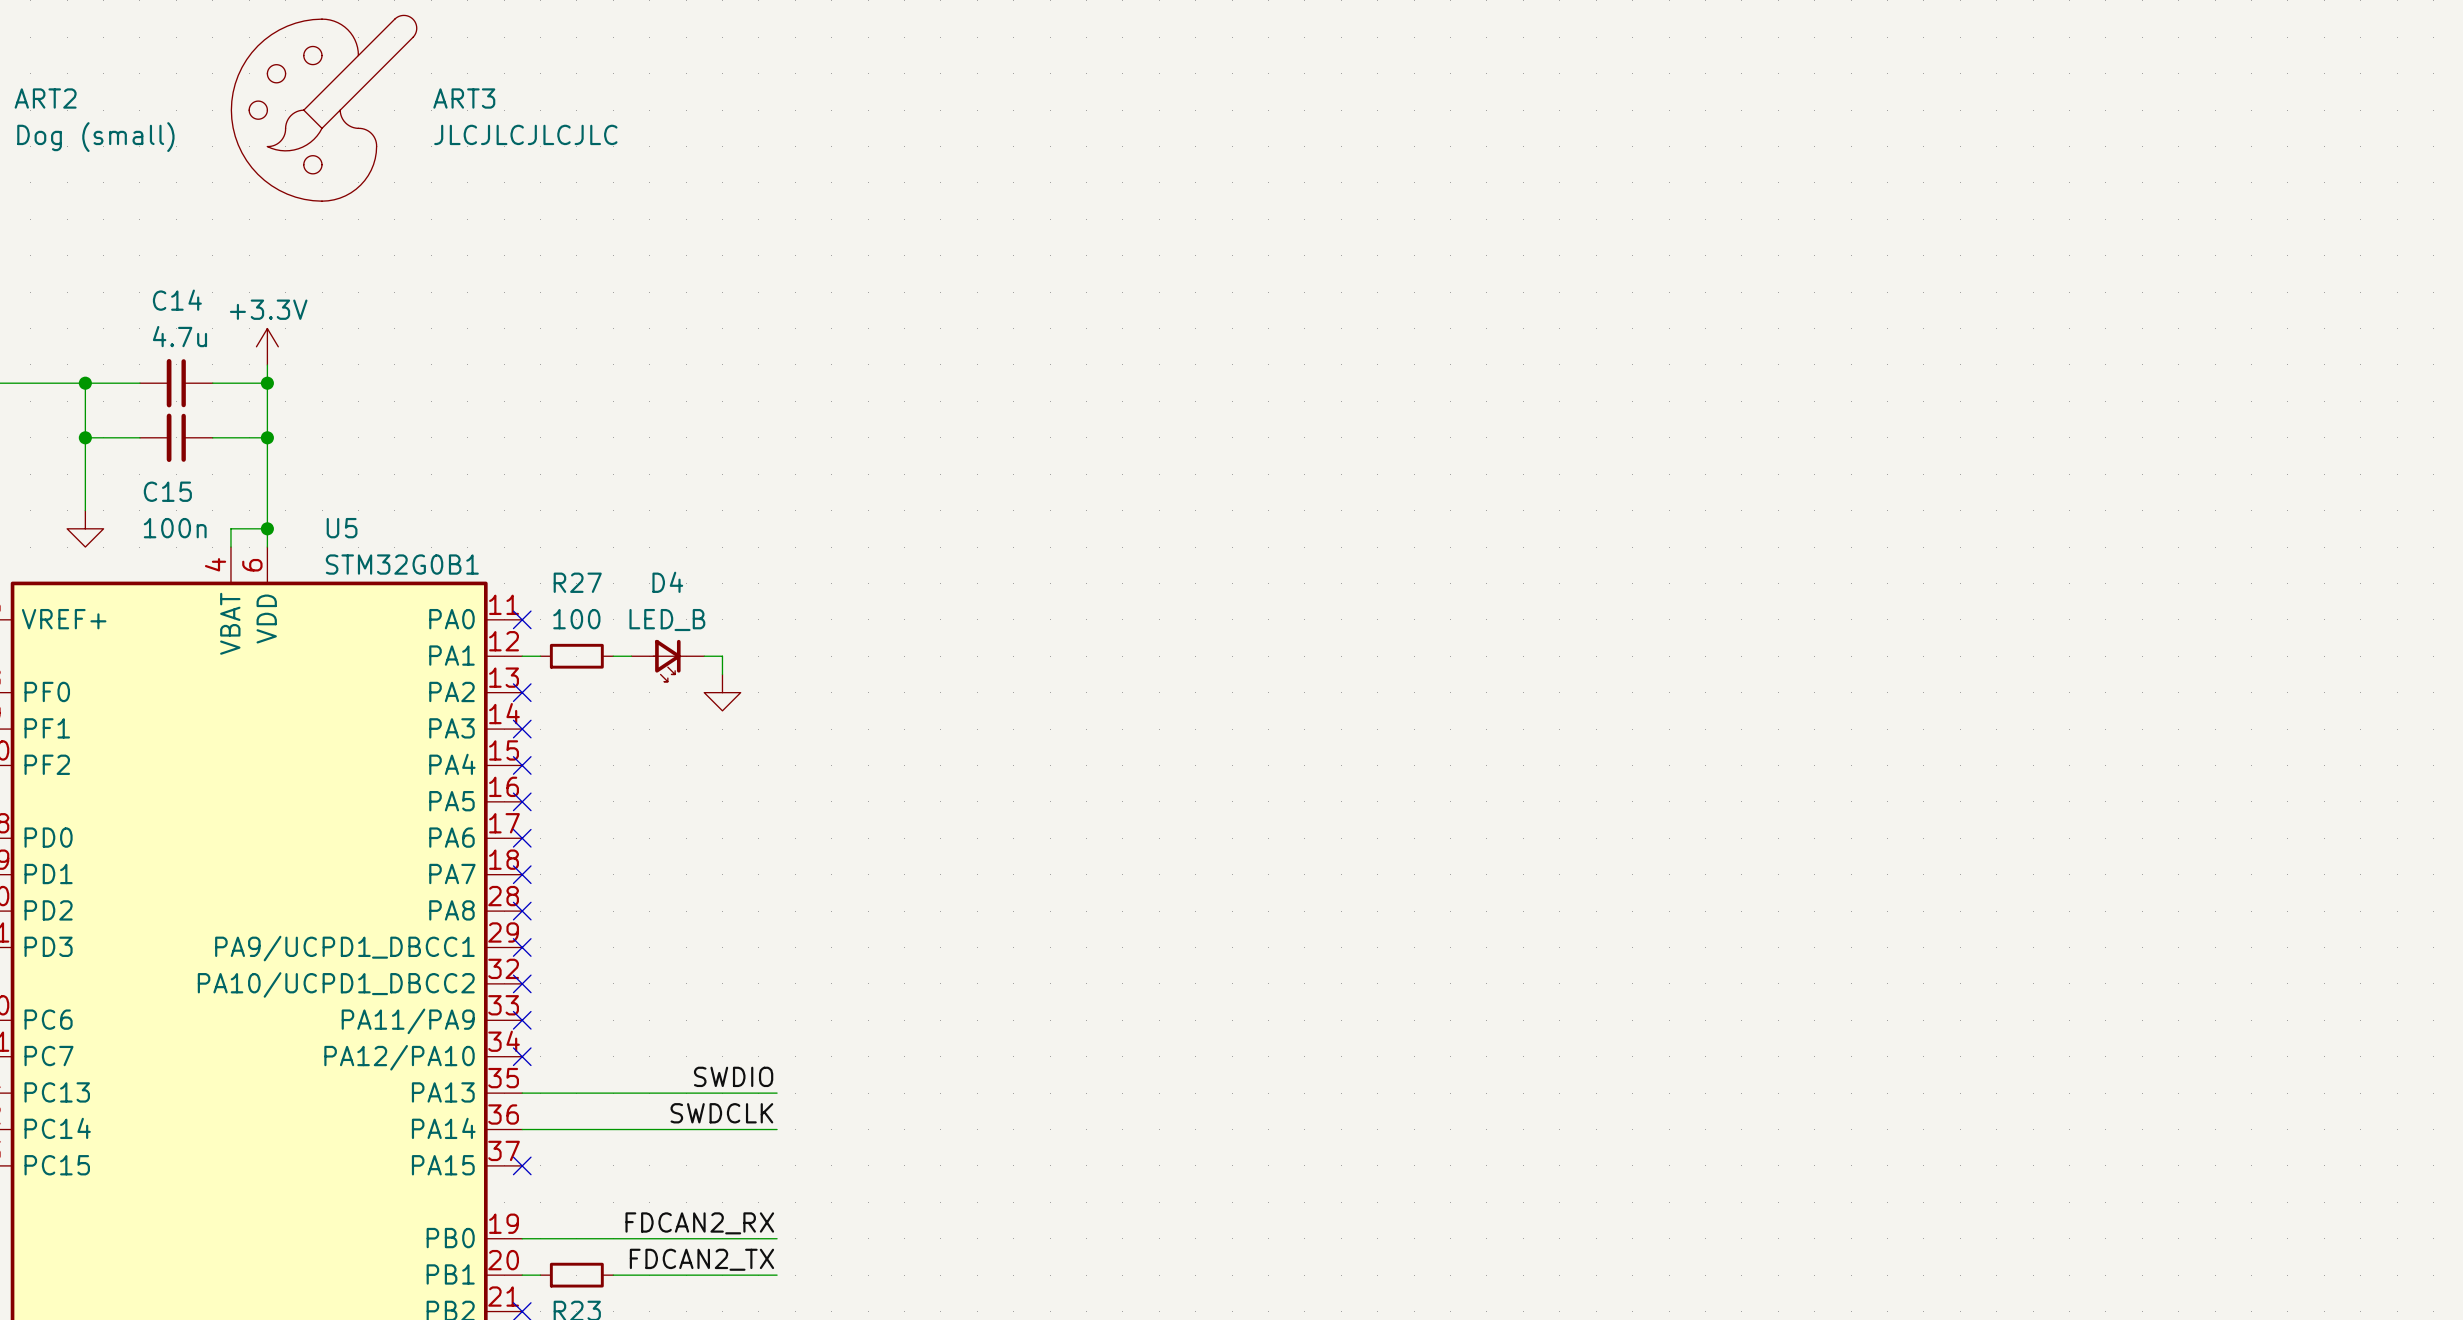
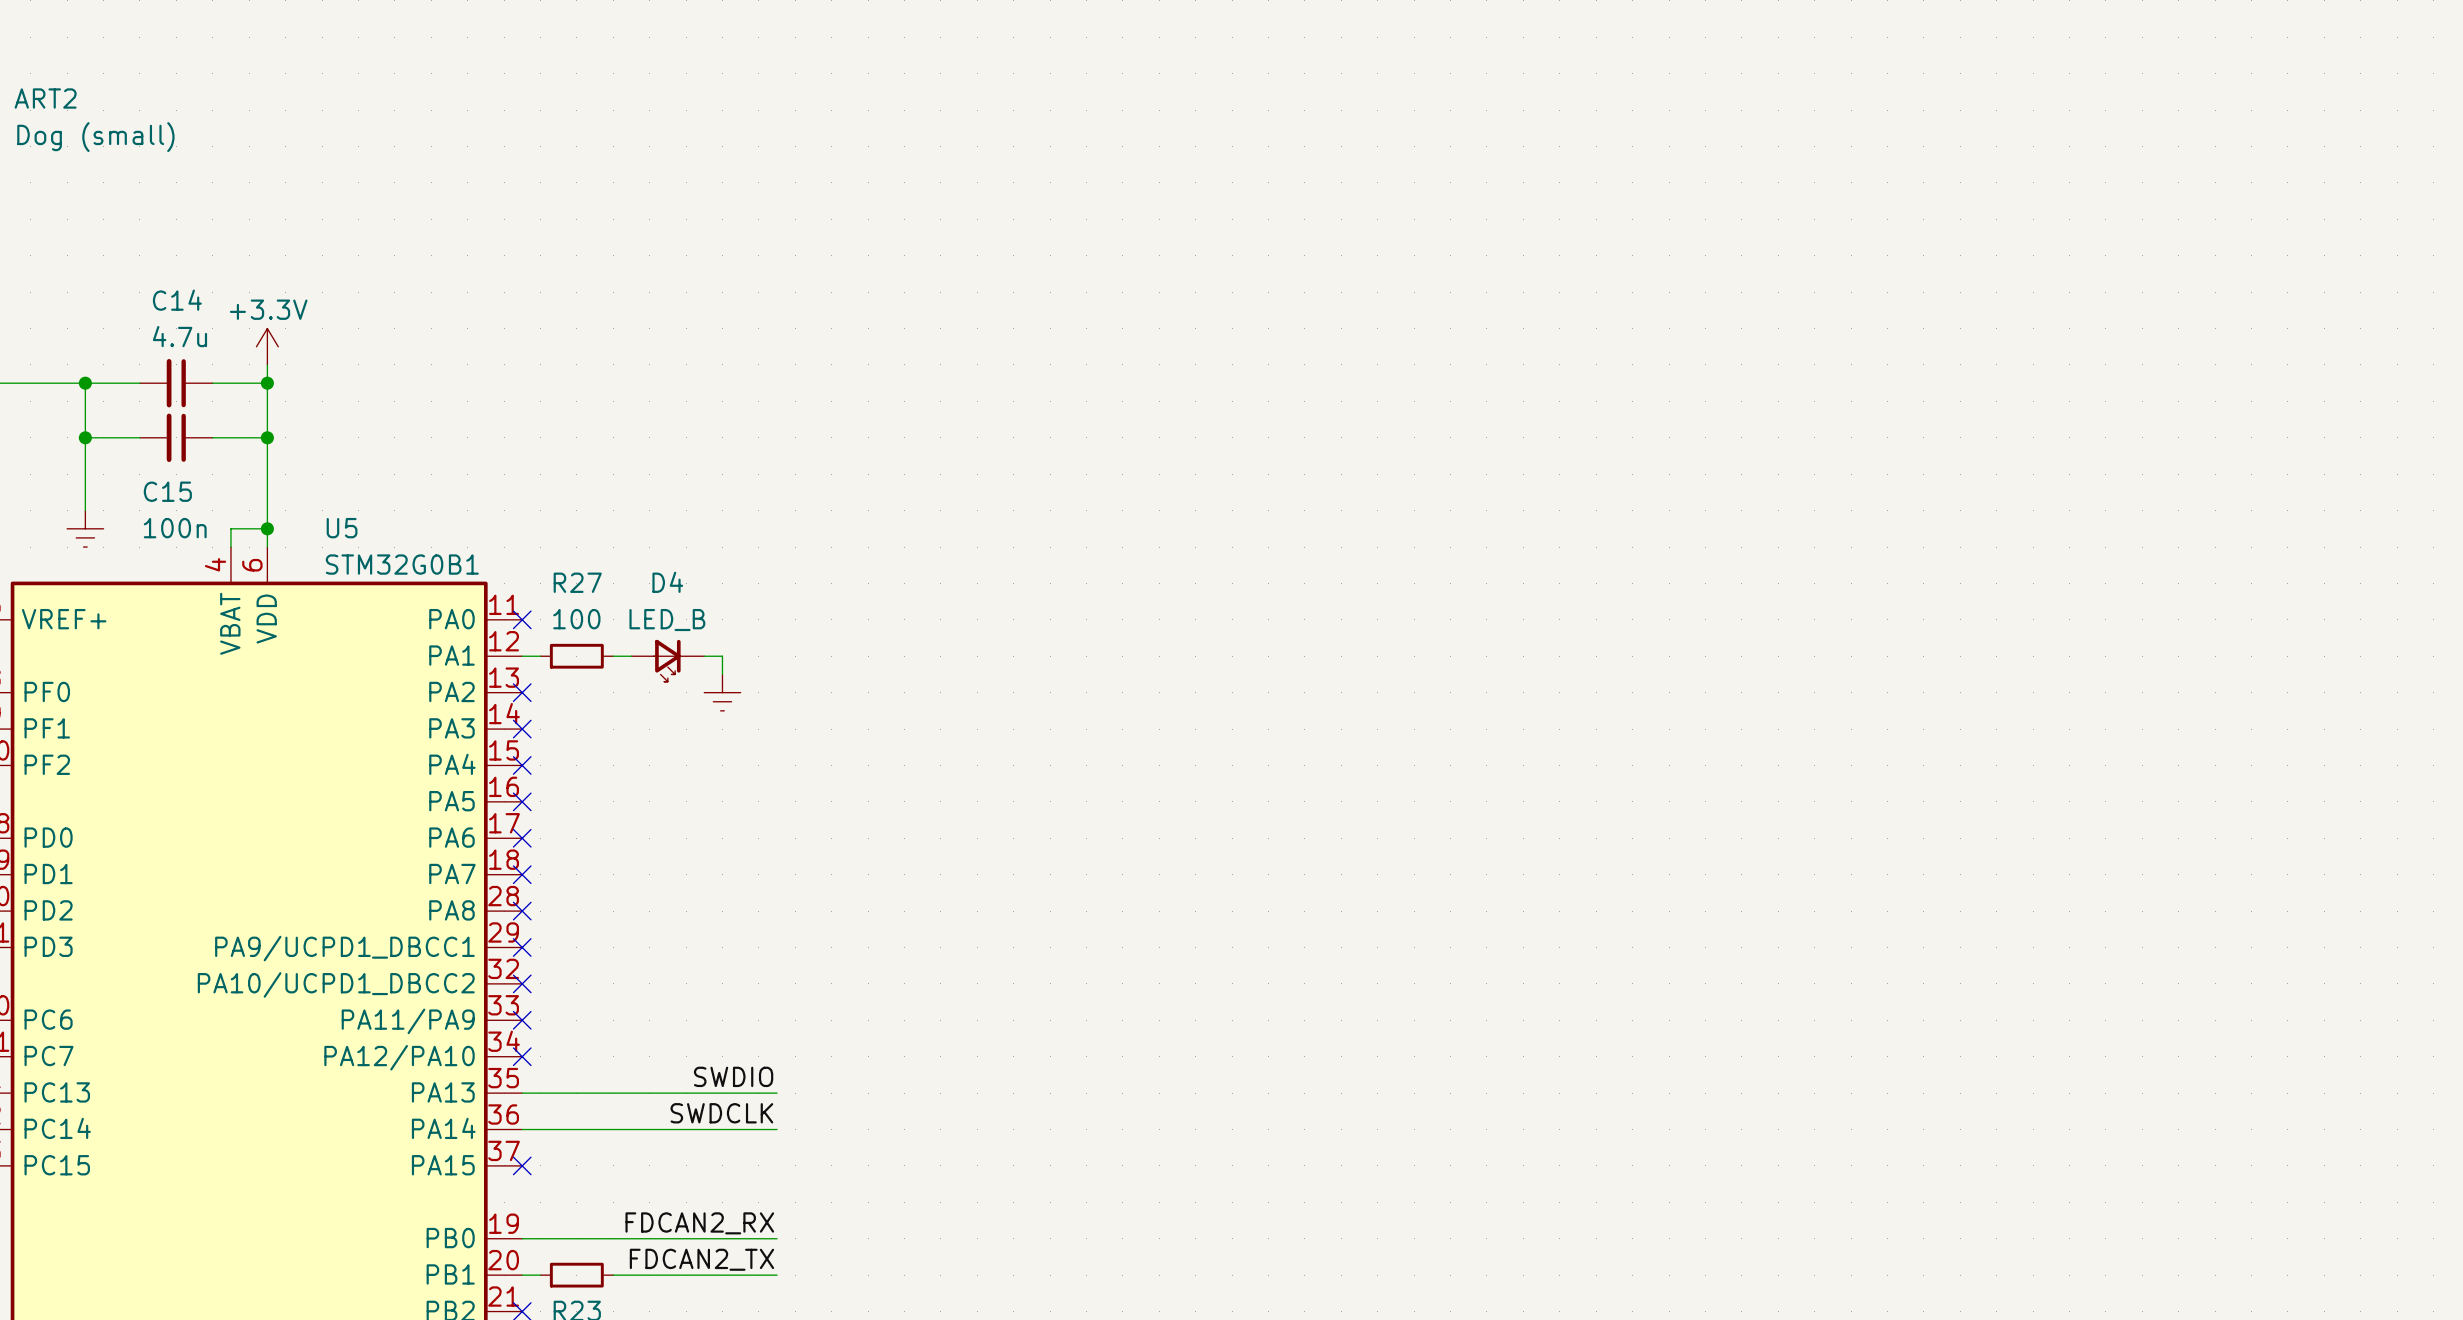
ART3: JLCJLCJLCJLC (324, 108) -> none
power symbol shape: [67, 510, 104, 548] -> [67, 510, 104, 548]
power symbol shape: [704, 674, 741, 711] -> [704, 674, 741, 711]

